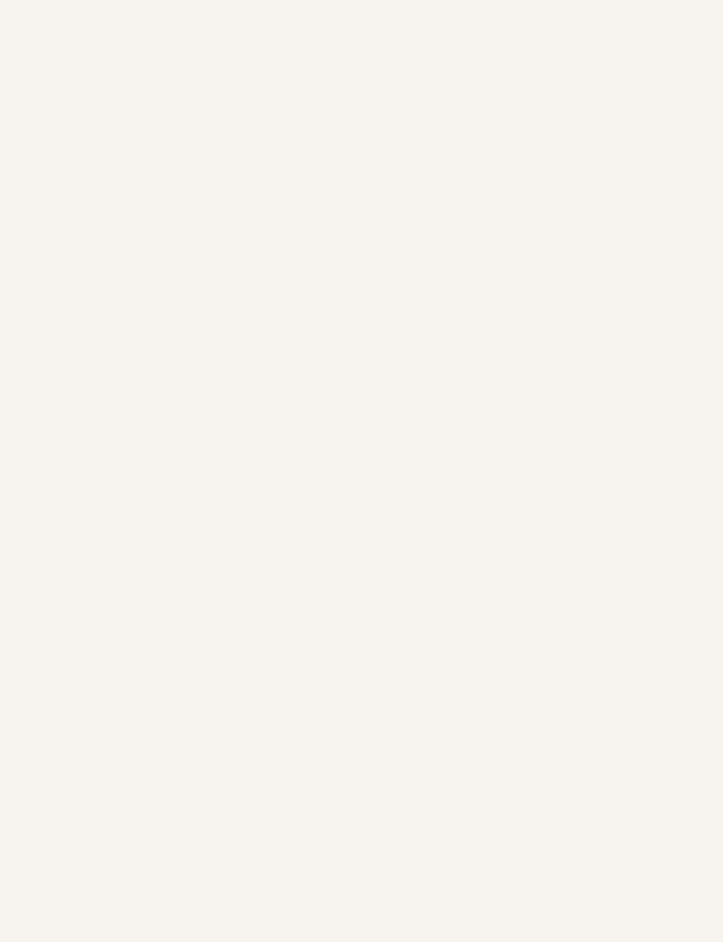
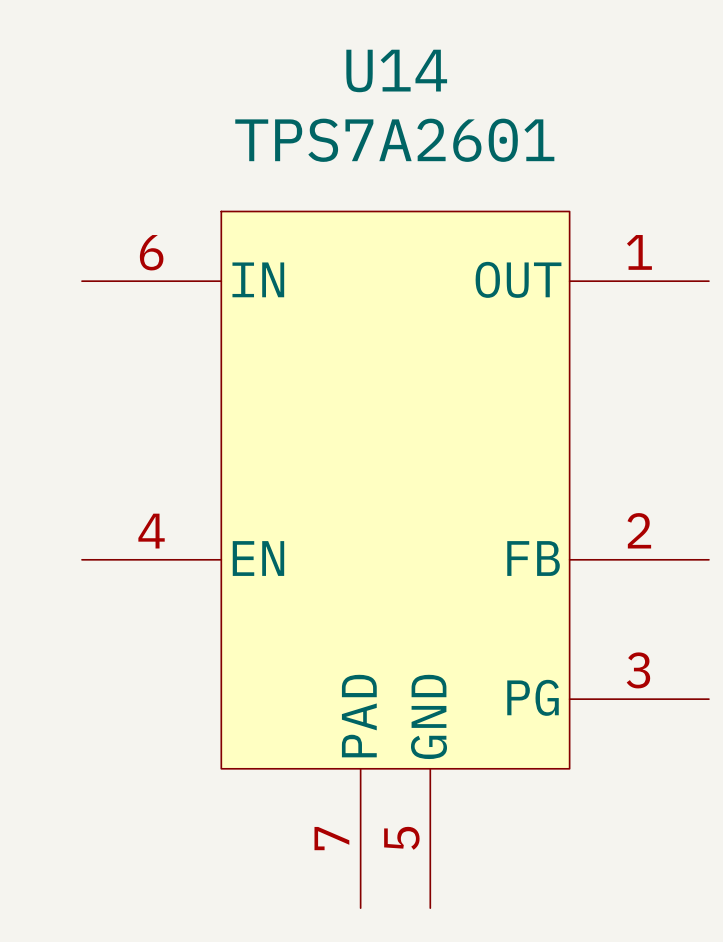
U14: none -> TPS7A2601 (395, 559)

